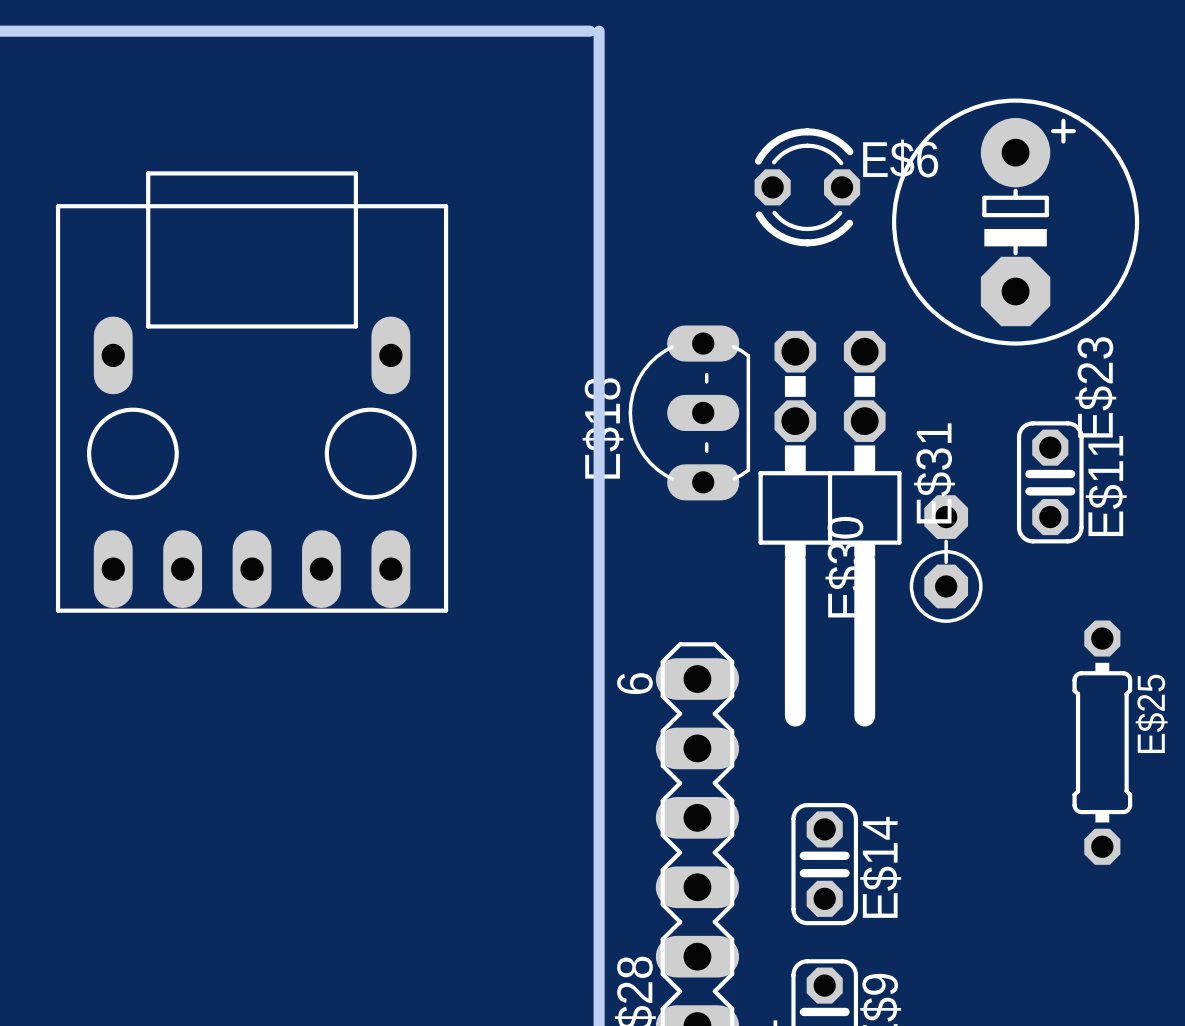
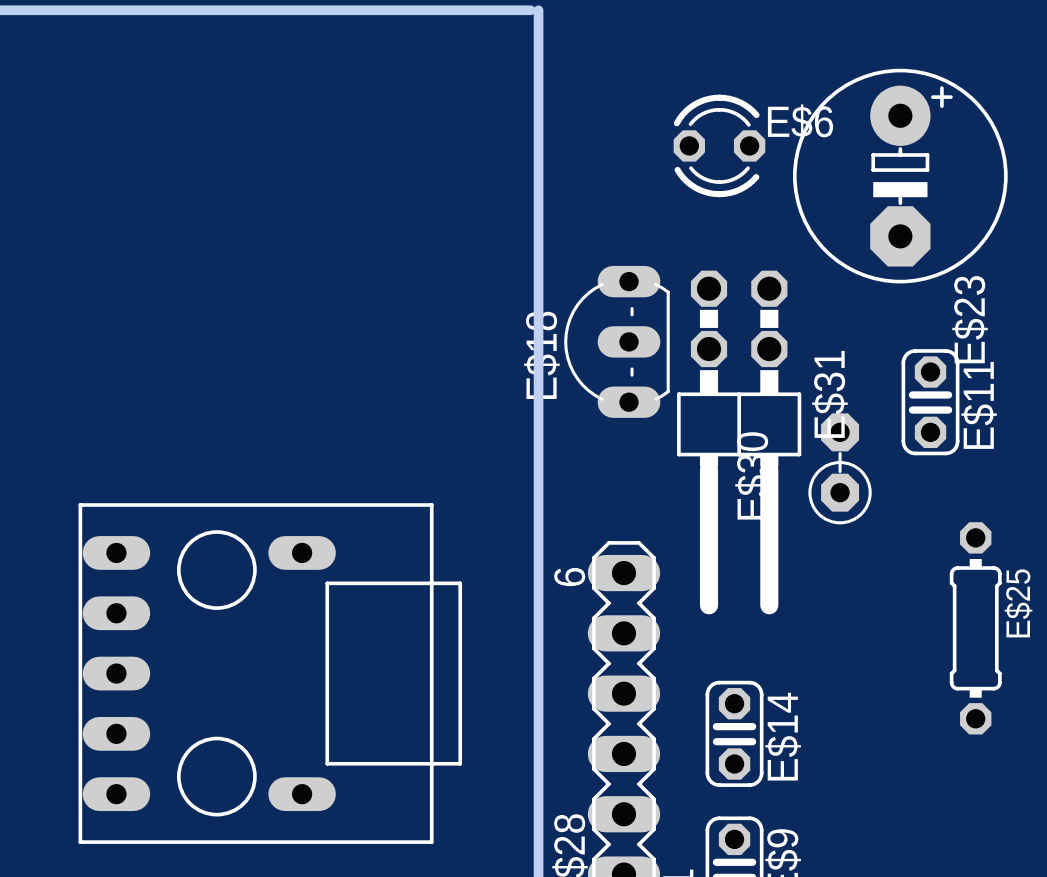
part rotation: 0° (252, 392) -> 90° clockwise (270, 673)
part position: (252, 392) -> (270, 673)

